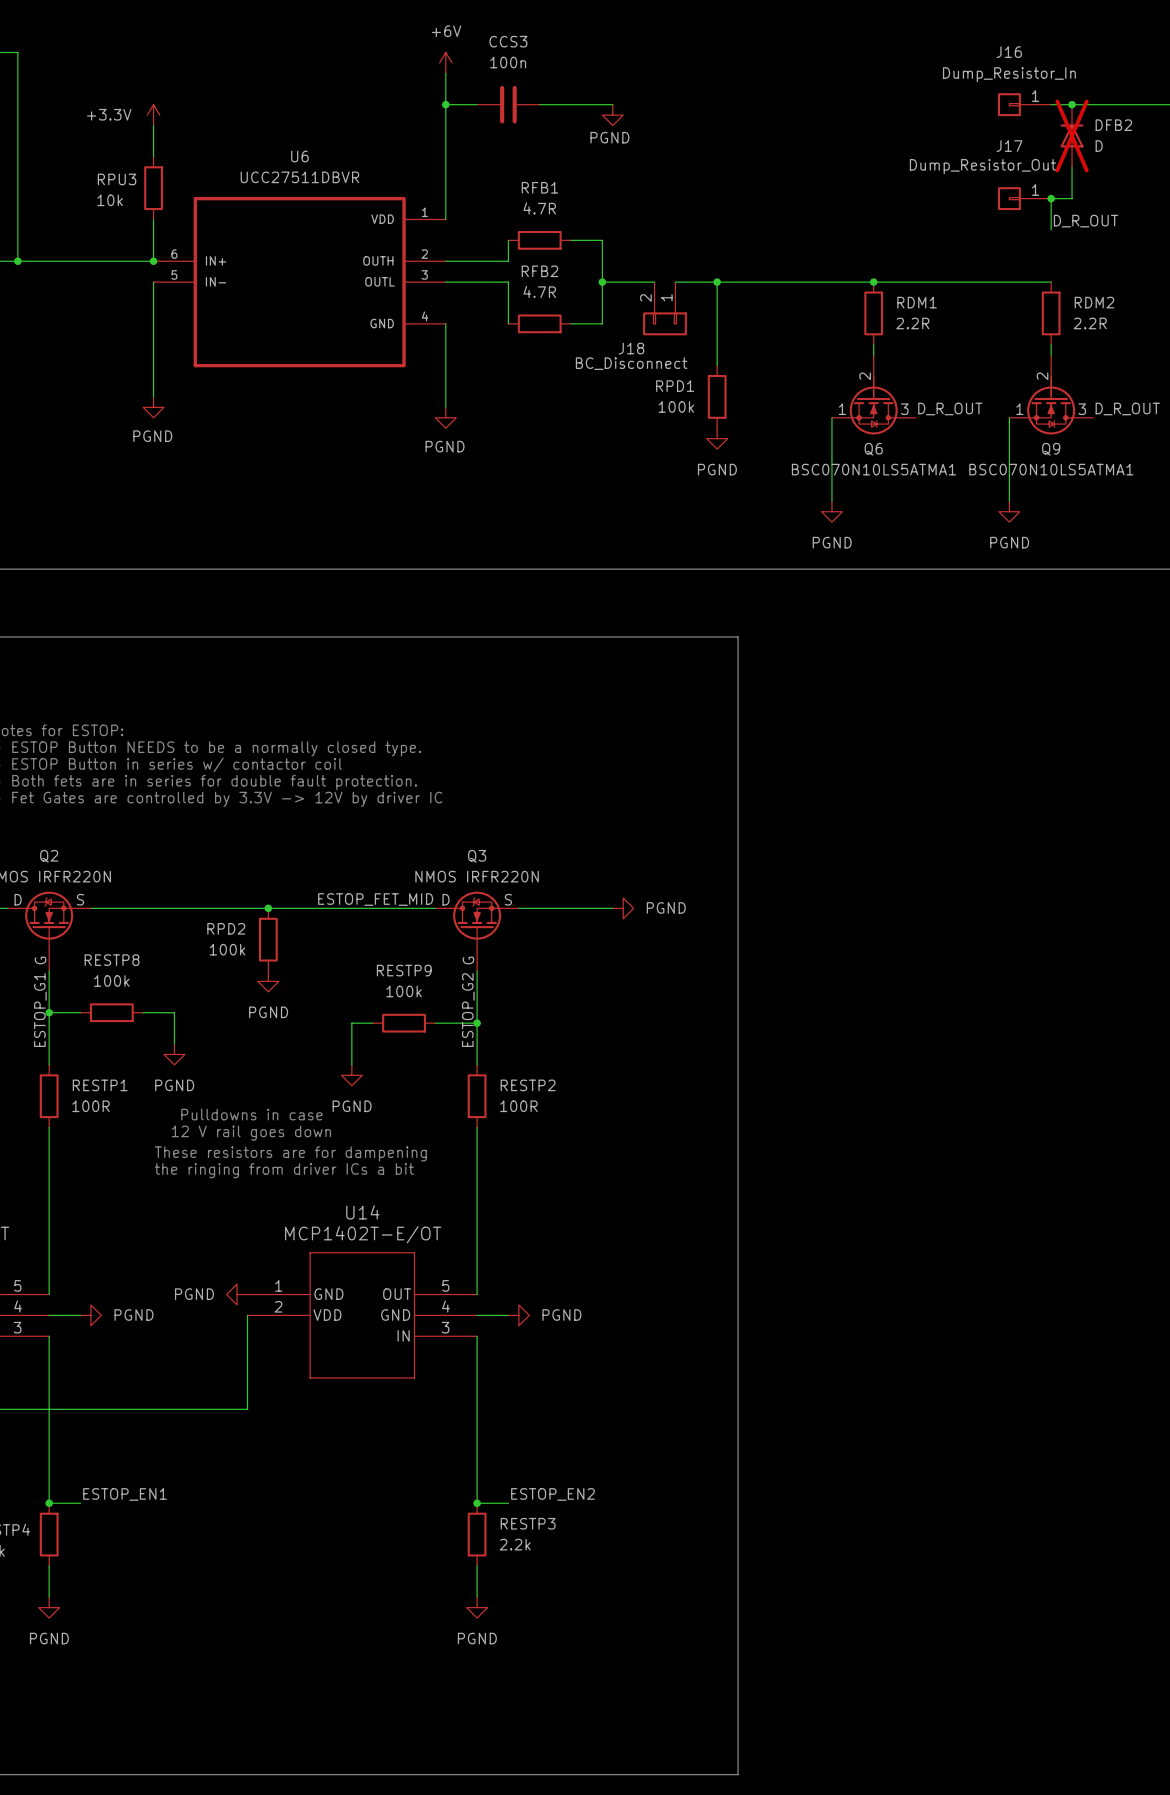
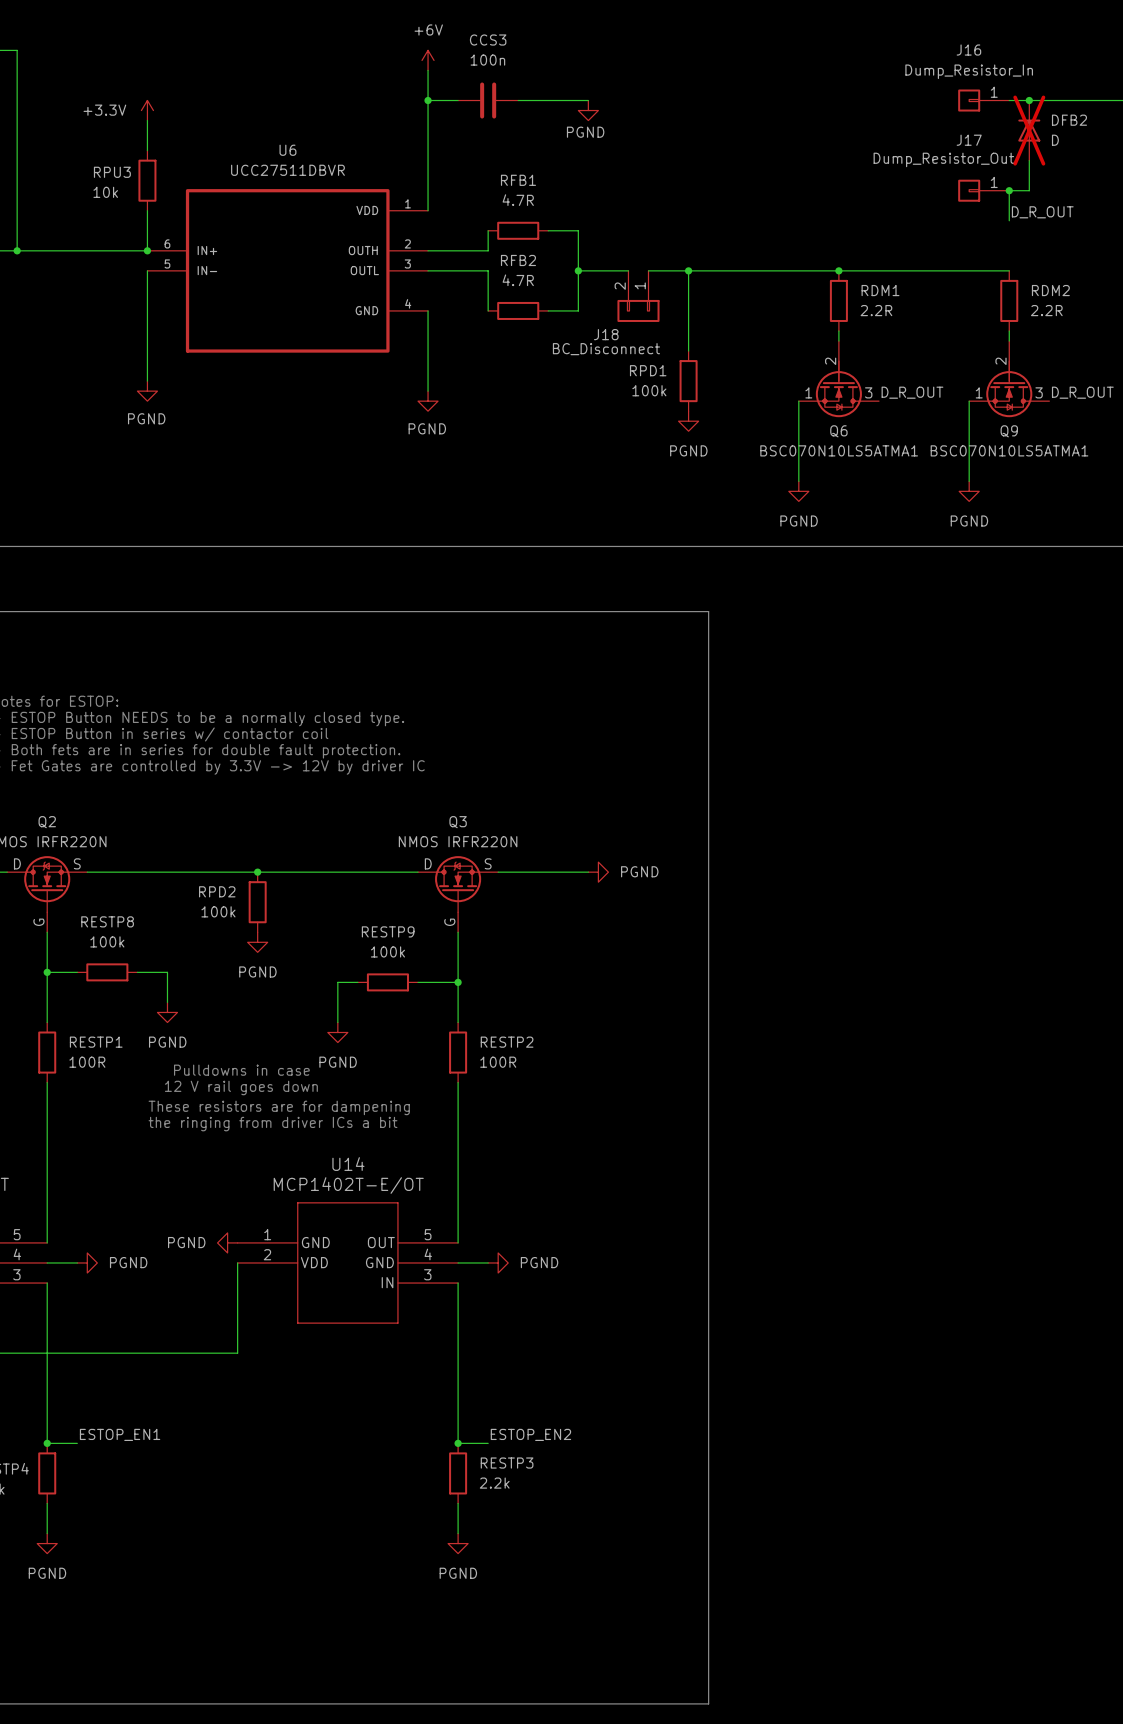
label: ESTOP_FET_MID (375, 899) -> none
label: ESTOP_G1 (40, 1010) -> none
label: ESTOP_G2 (468, 1010) -> none

